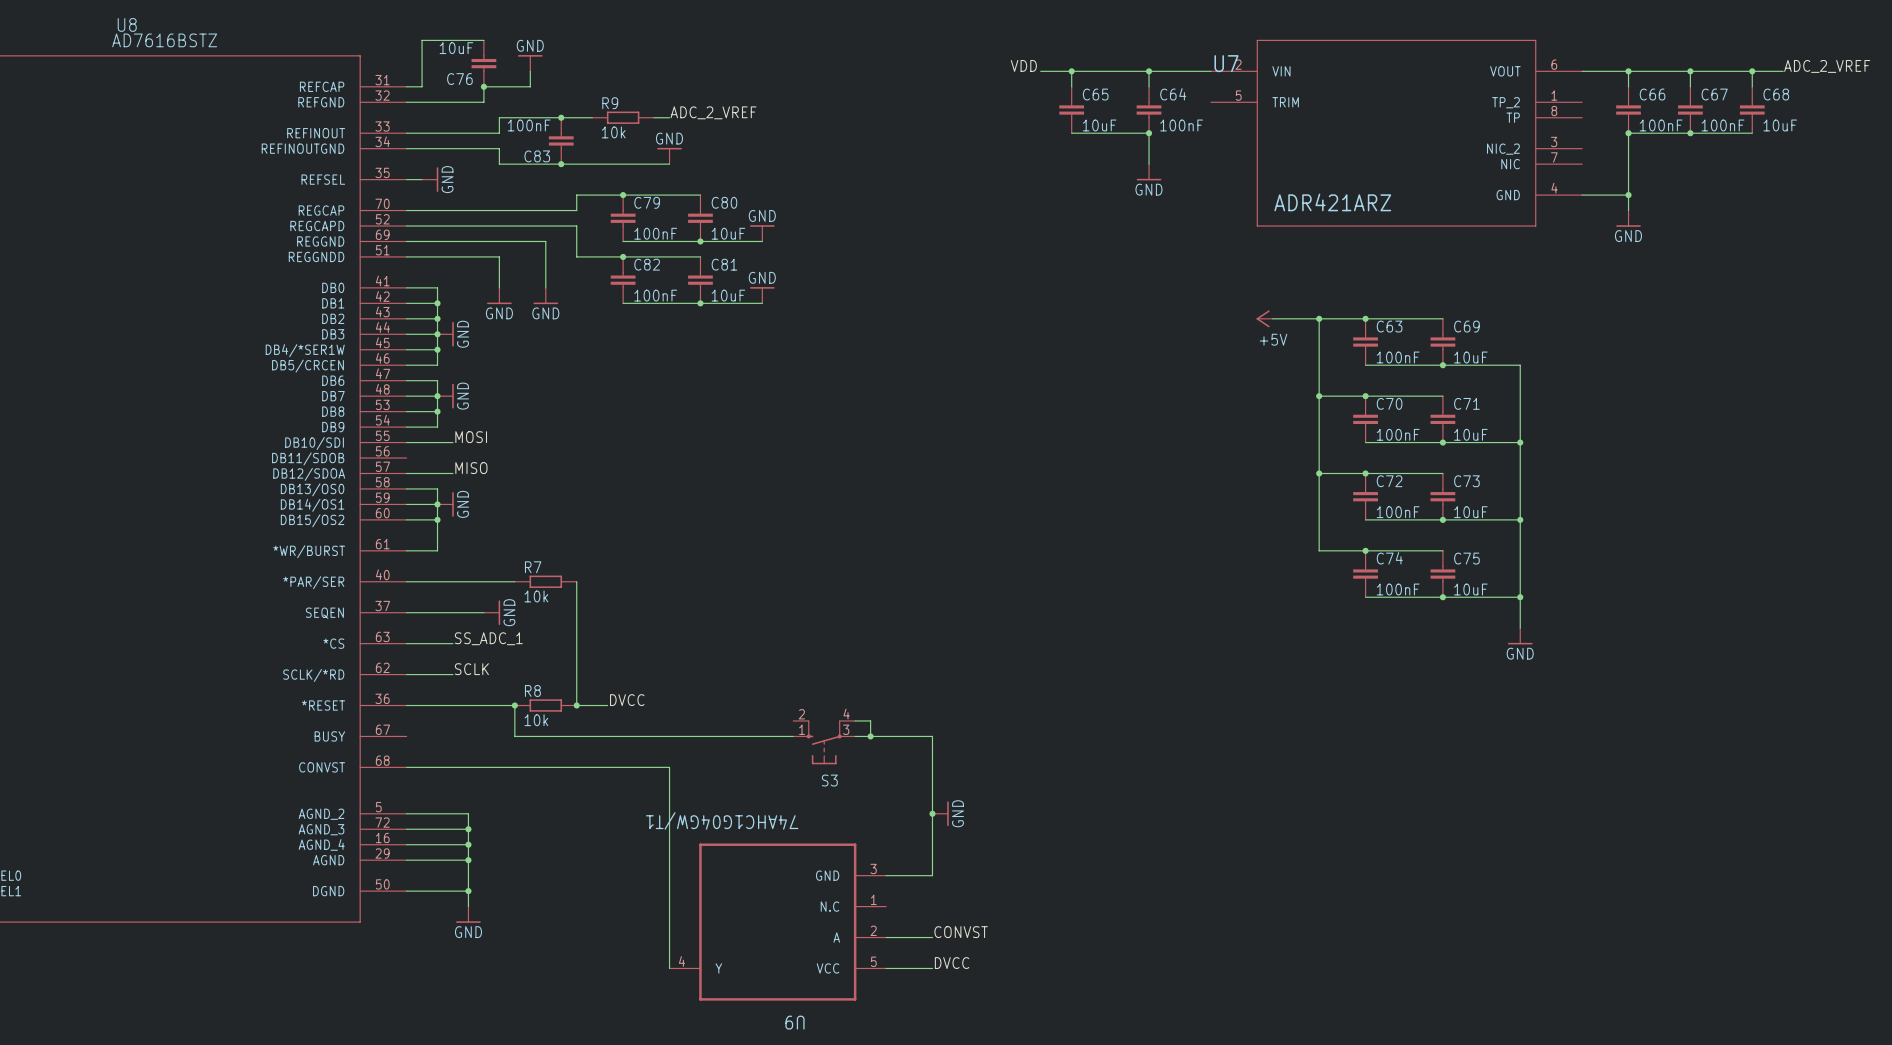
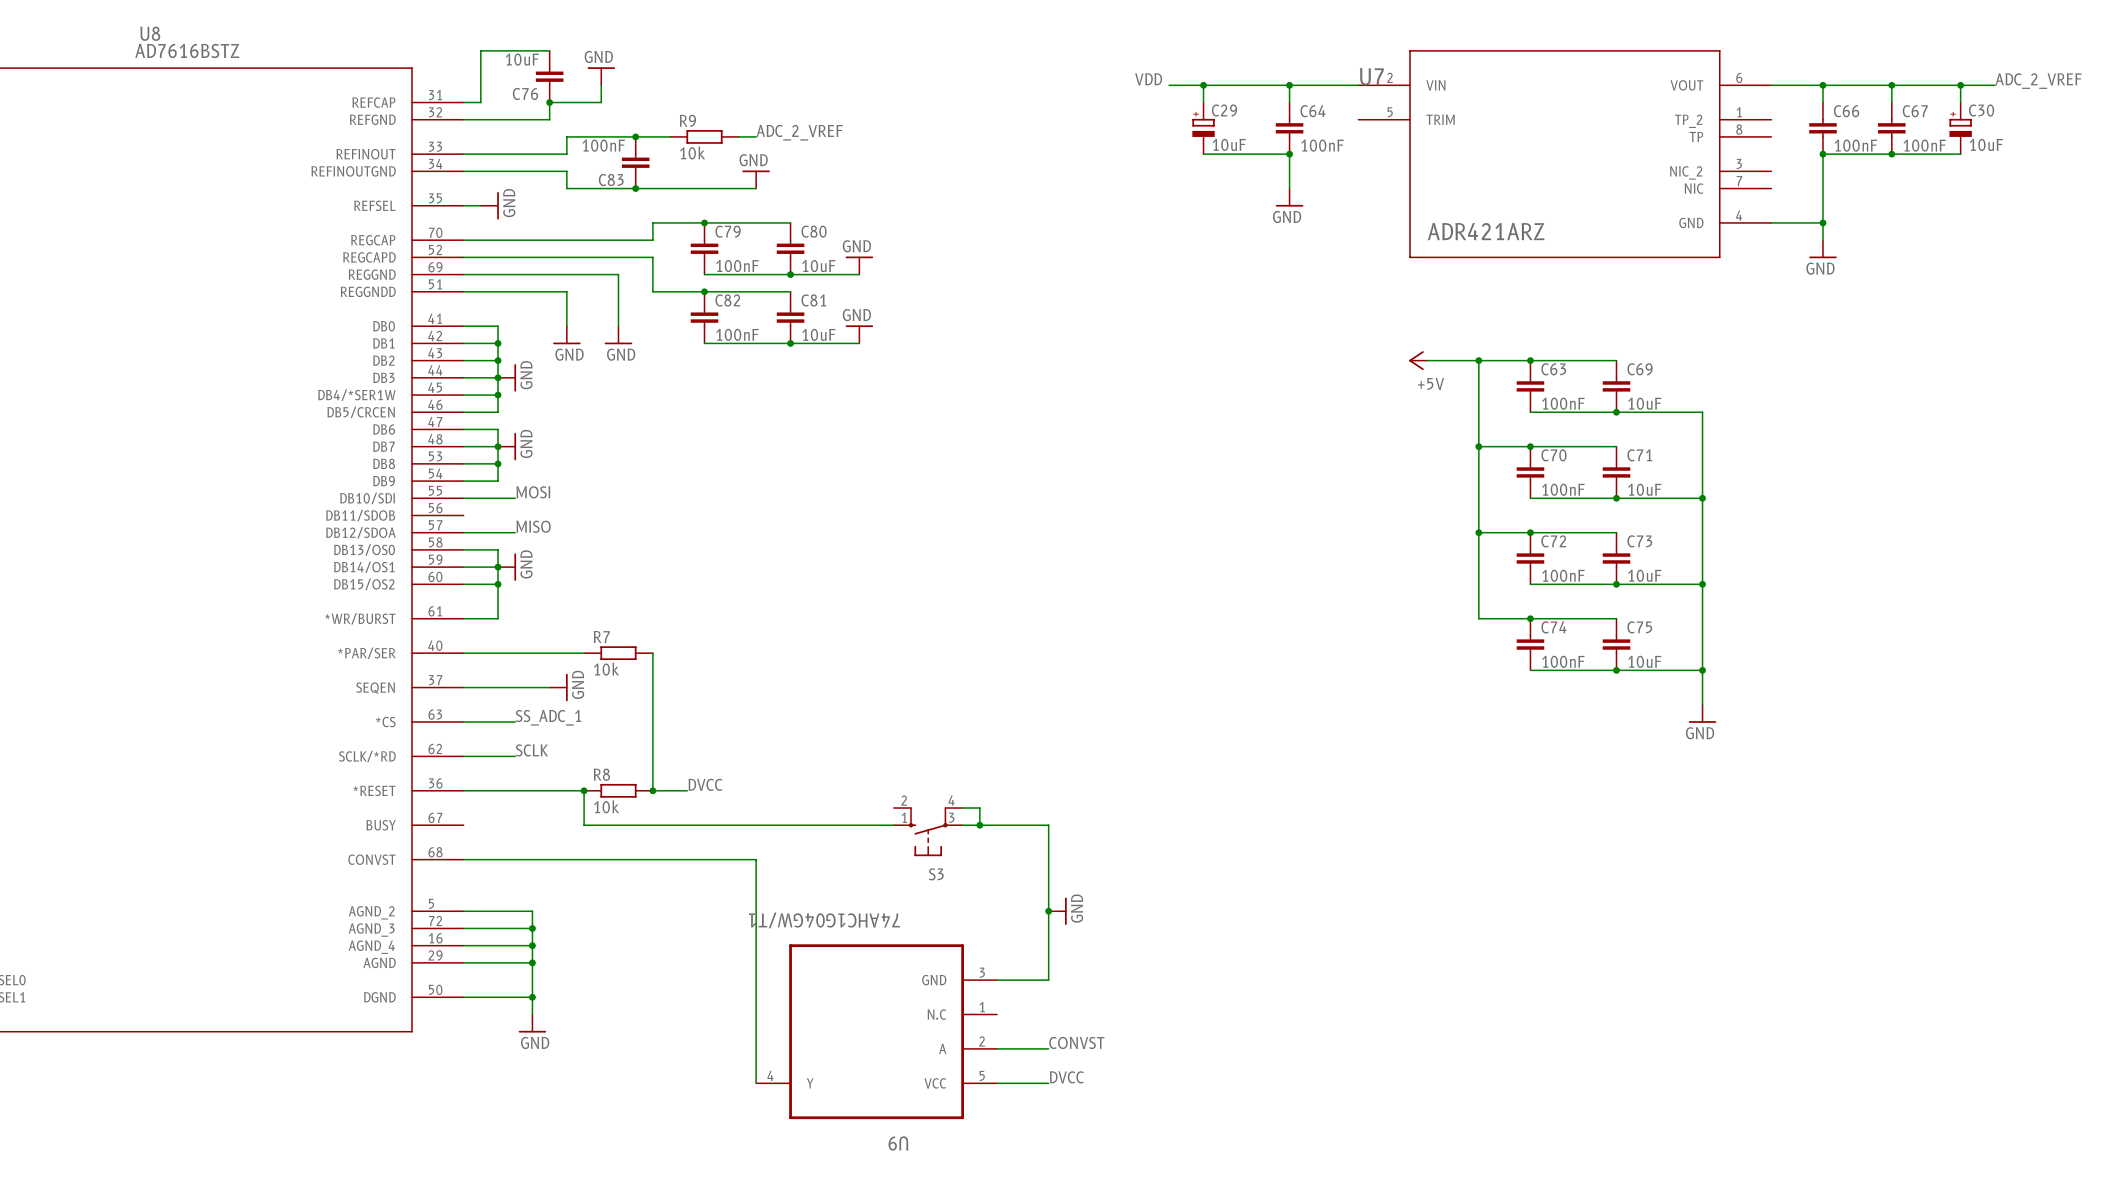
C65: 10uF (1071, 110) -> none
C29: none -> 10uF (1203, 128)
C68: 10uF (1752, 110) -> none
C30: none -> 10uF (1960, 128)

